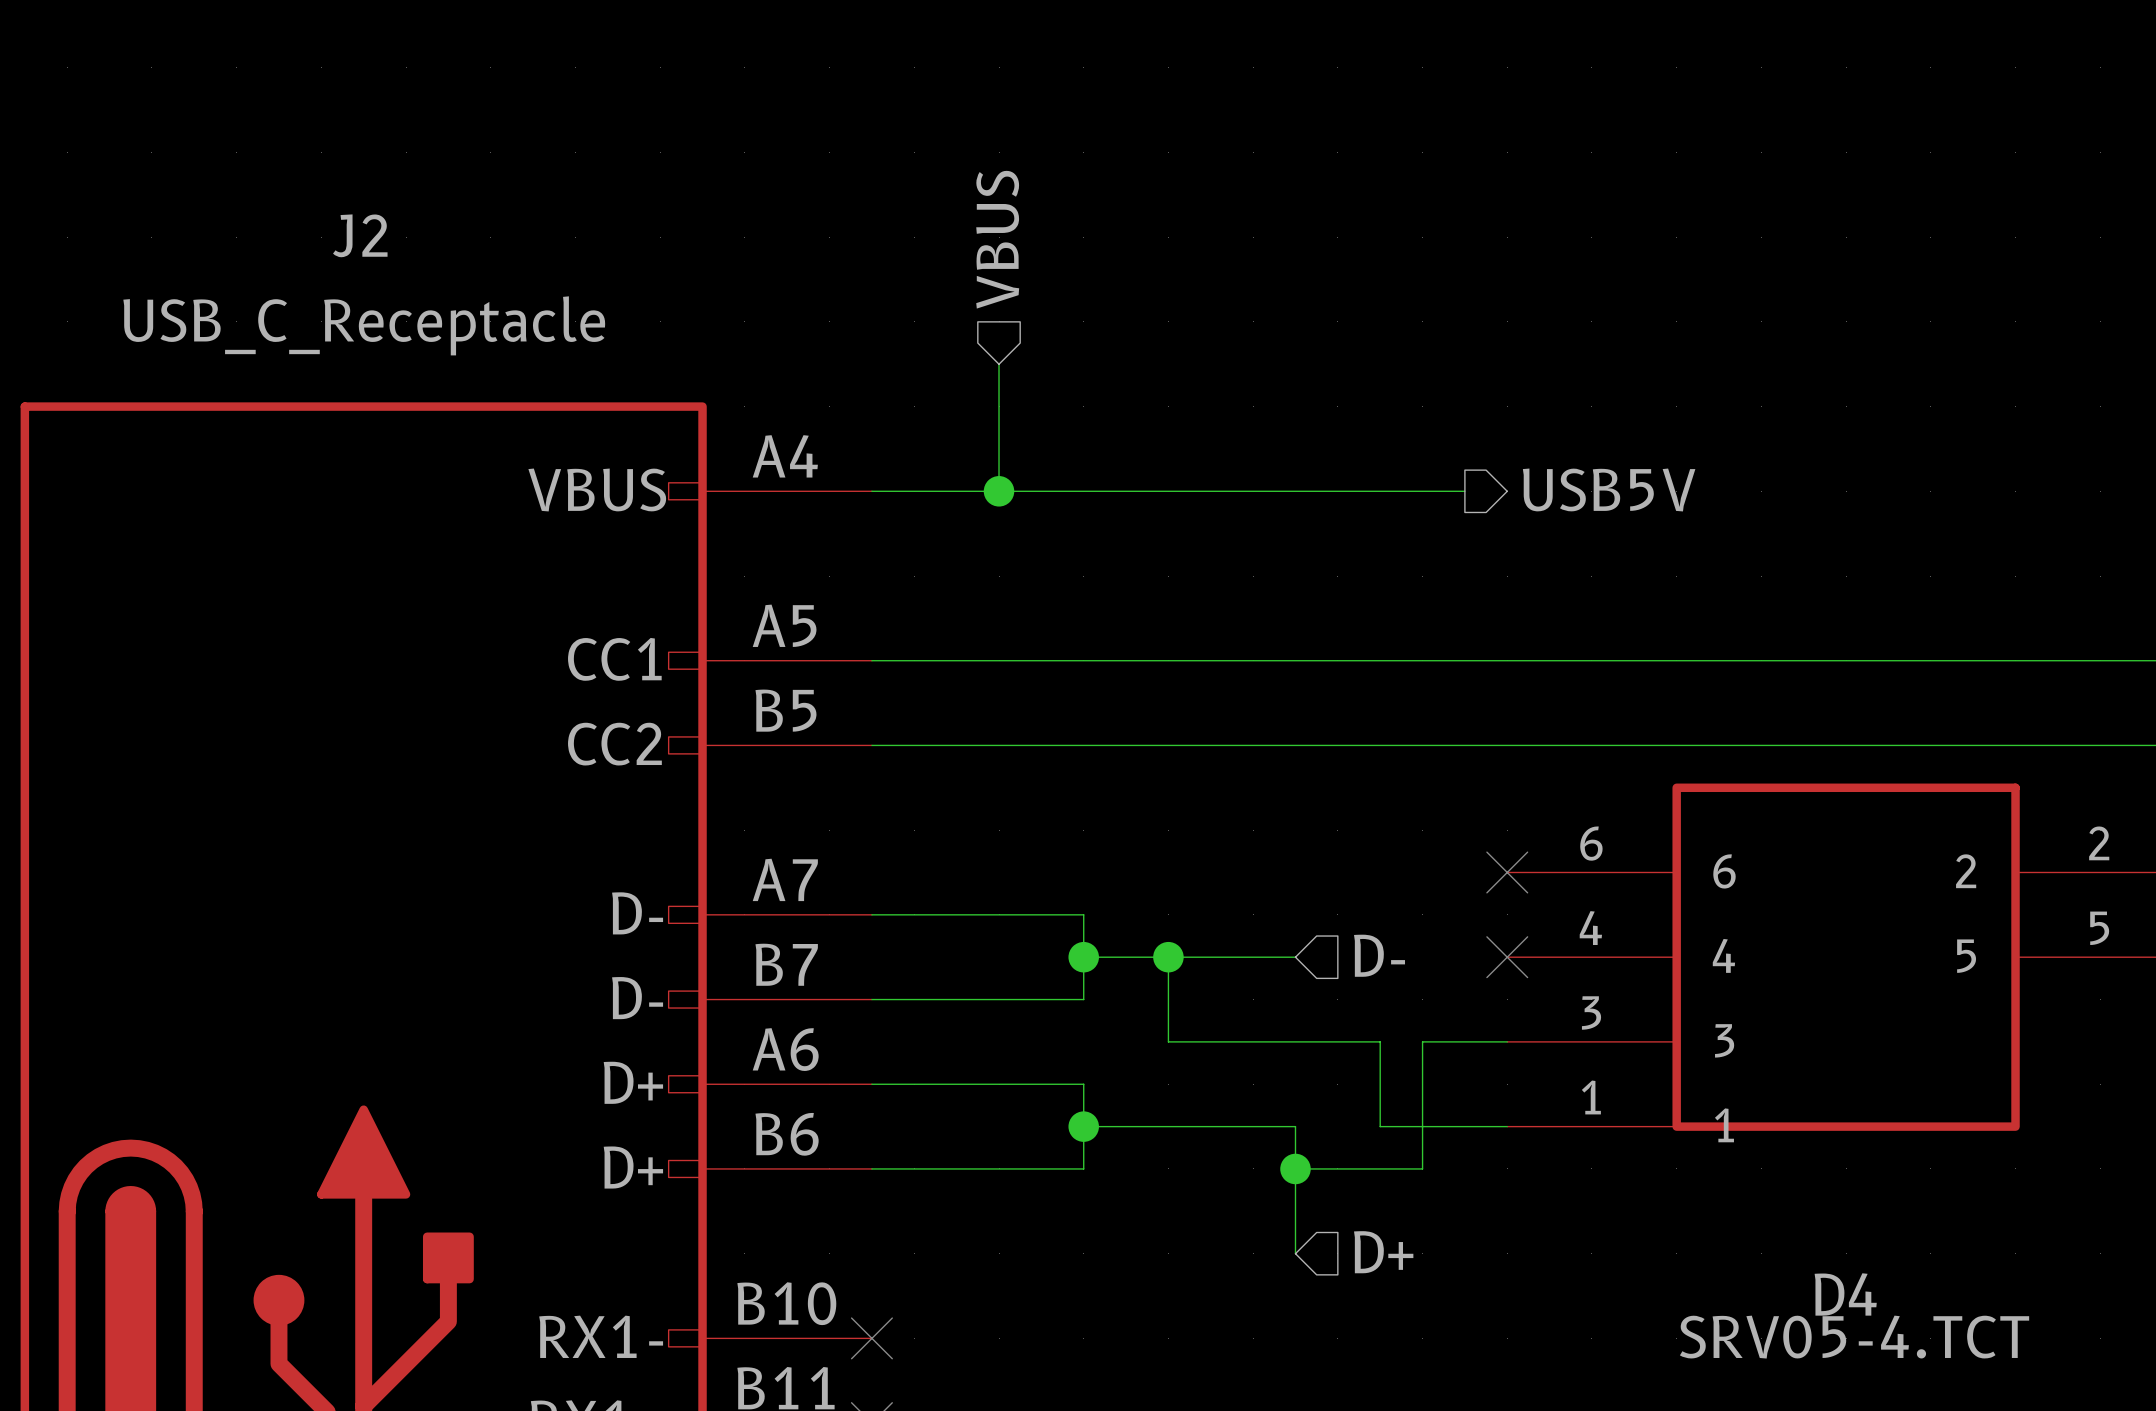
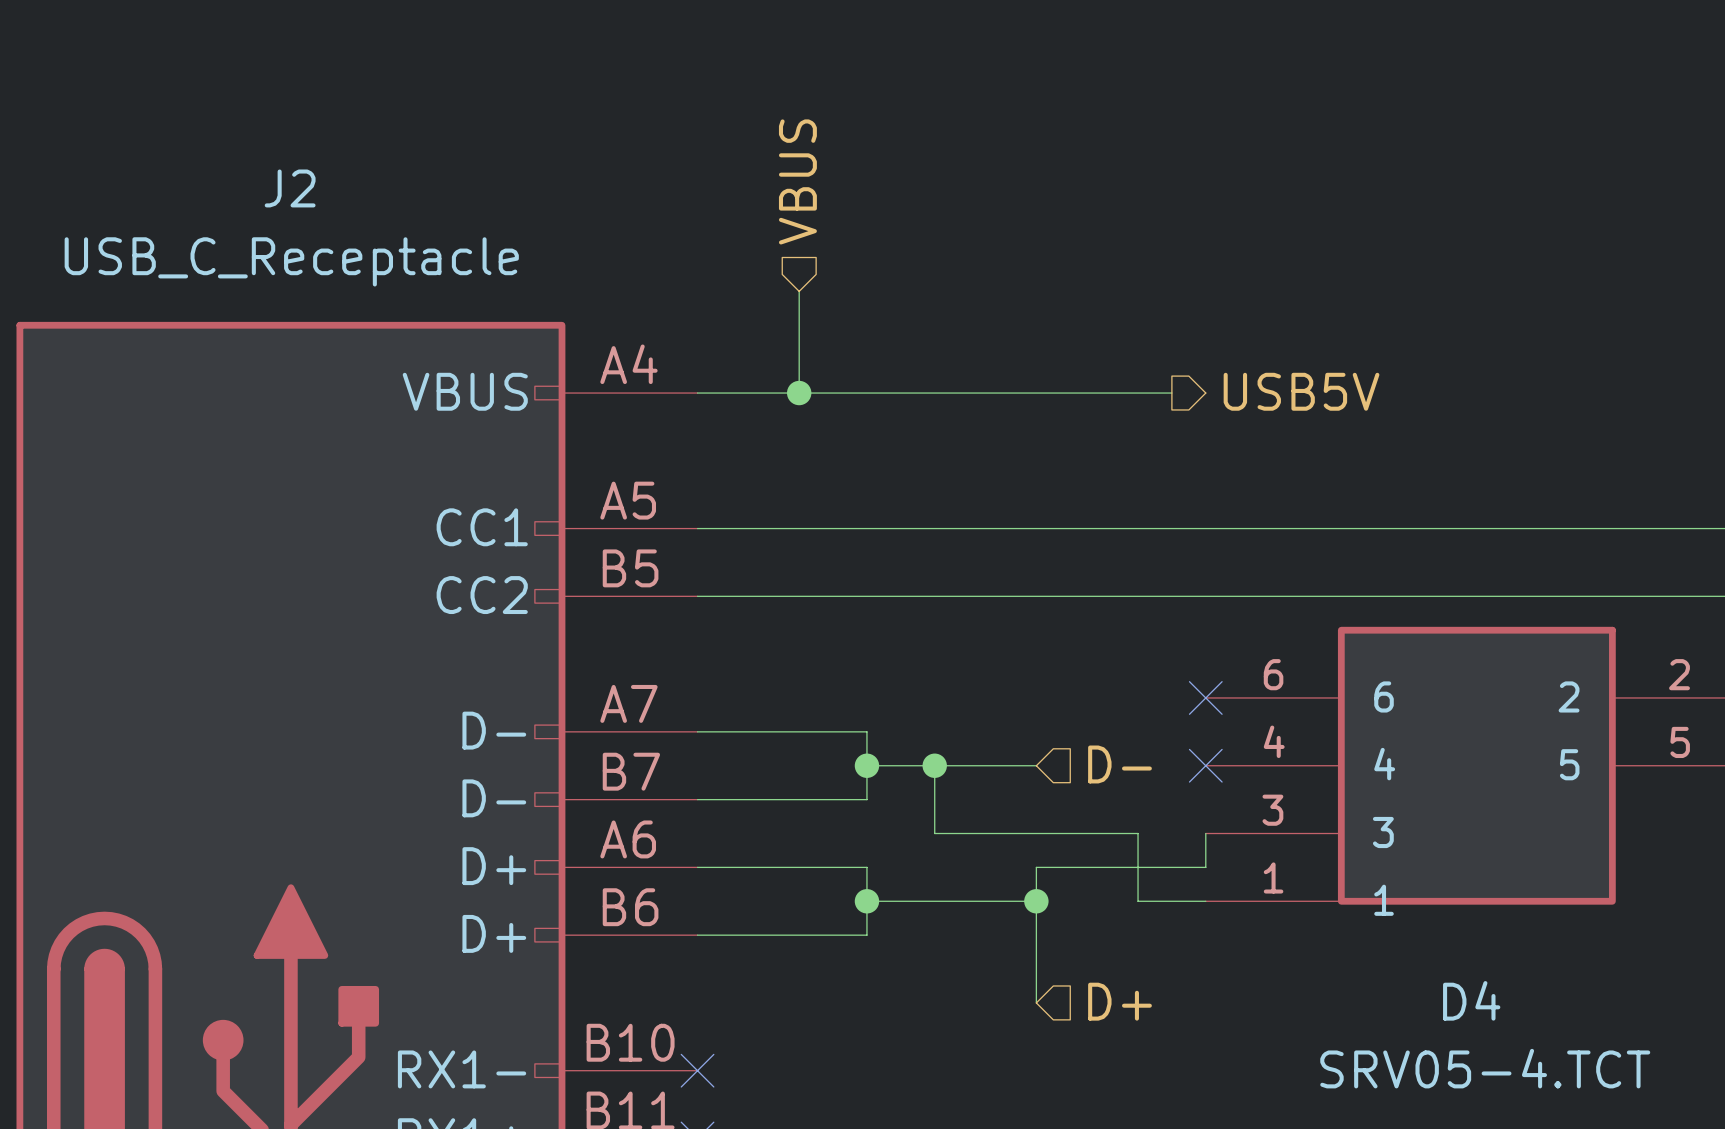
wire: (1380, 1041) (1380, 1126) (1422, 1126) (1422, 1168) (1295, 1168) -> none
wire: (1422, 1041) (1507, 1041) -> (1138, 833) (1104, 833)
wire: none -> (1205, 833) (1205, 867) (1036, 867) (1036, 901)
junction position: (1295, 1168) -> (1036, 901)
D4 name position: D4 (1845, 1294) -> D4 (1471, 1000)

